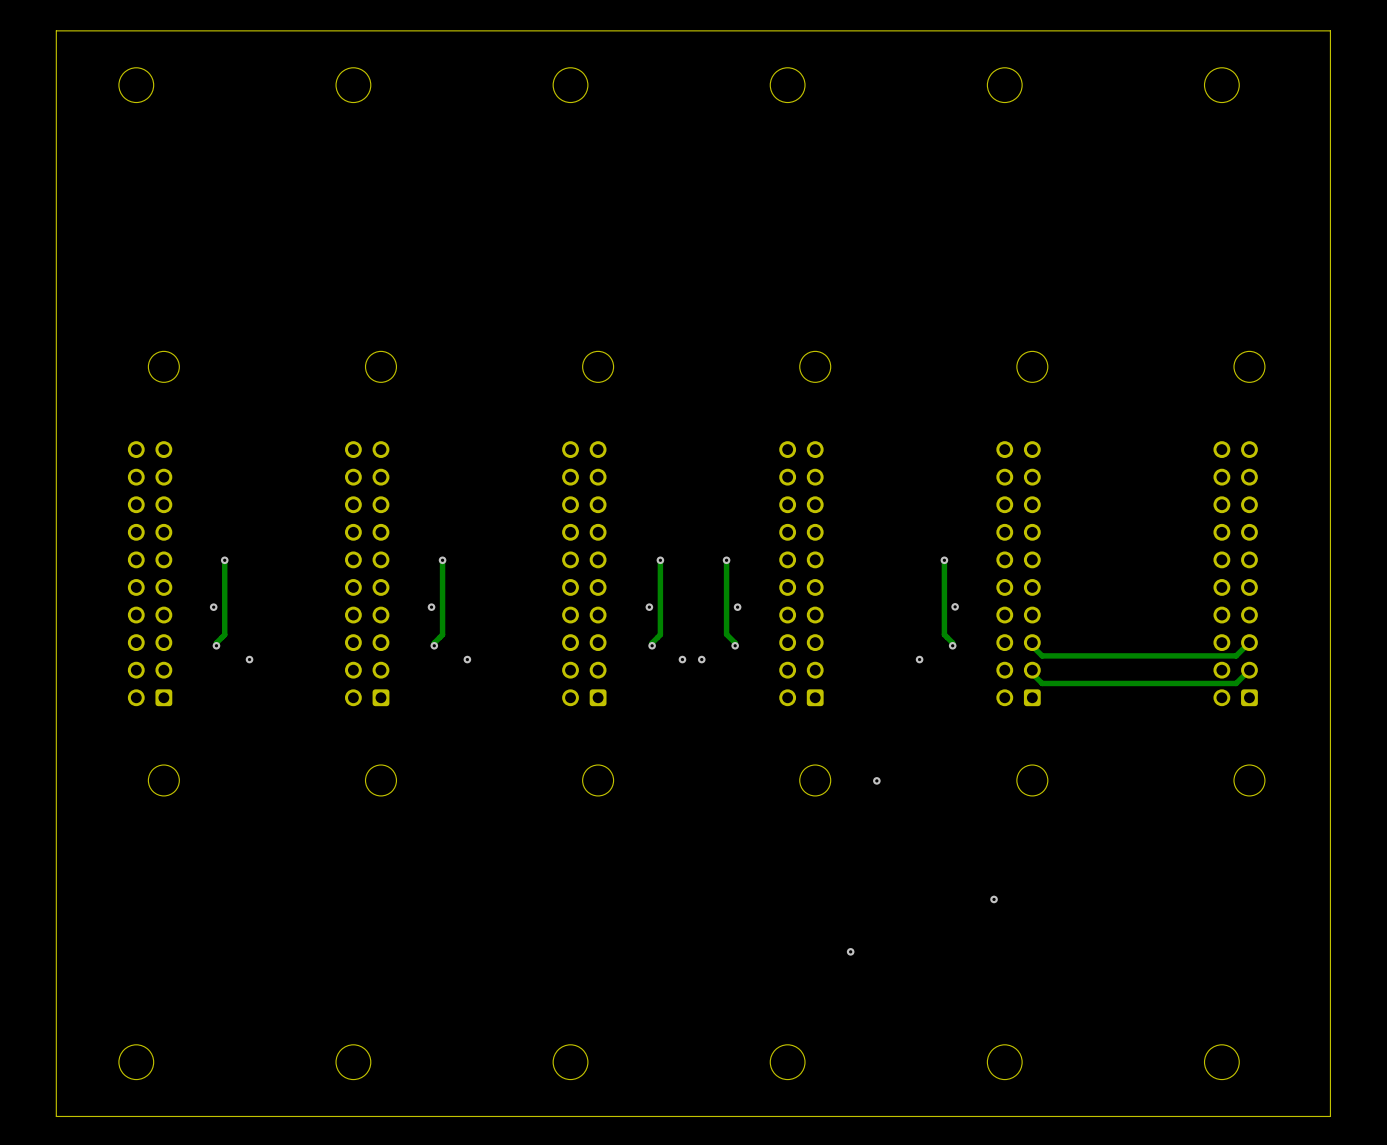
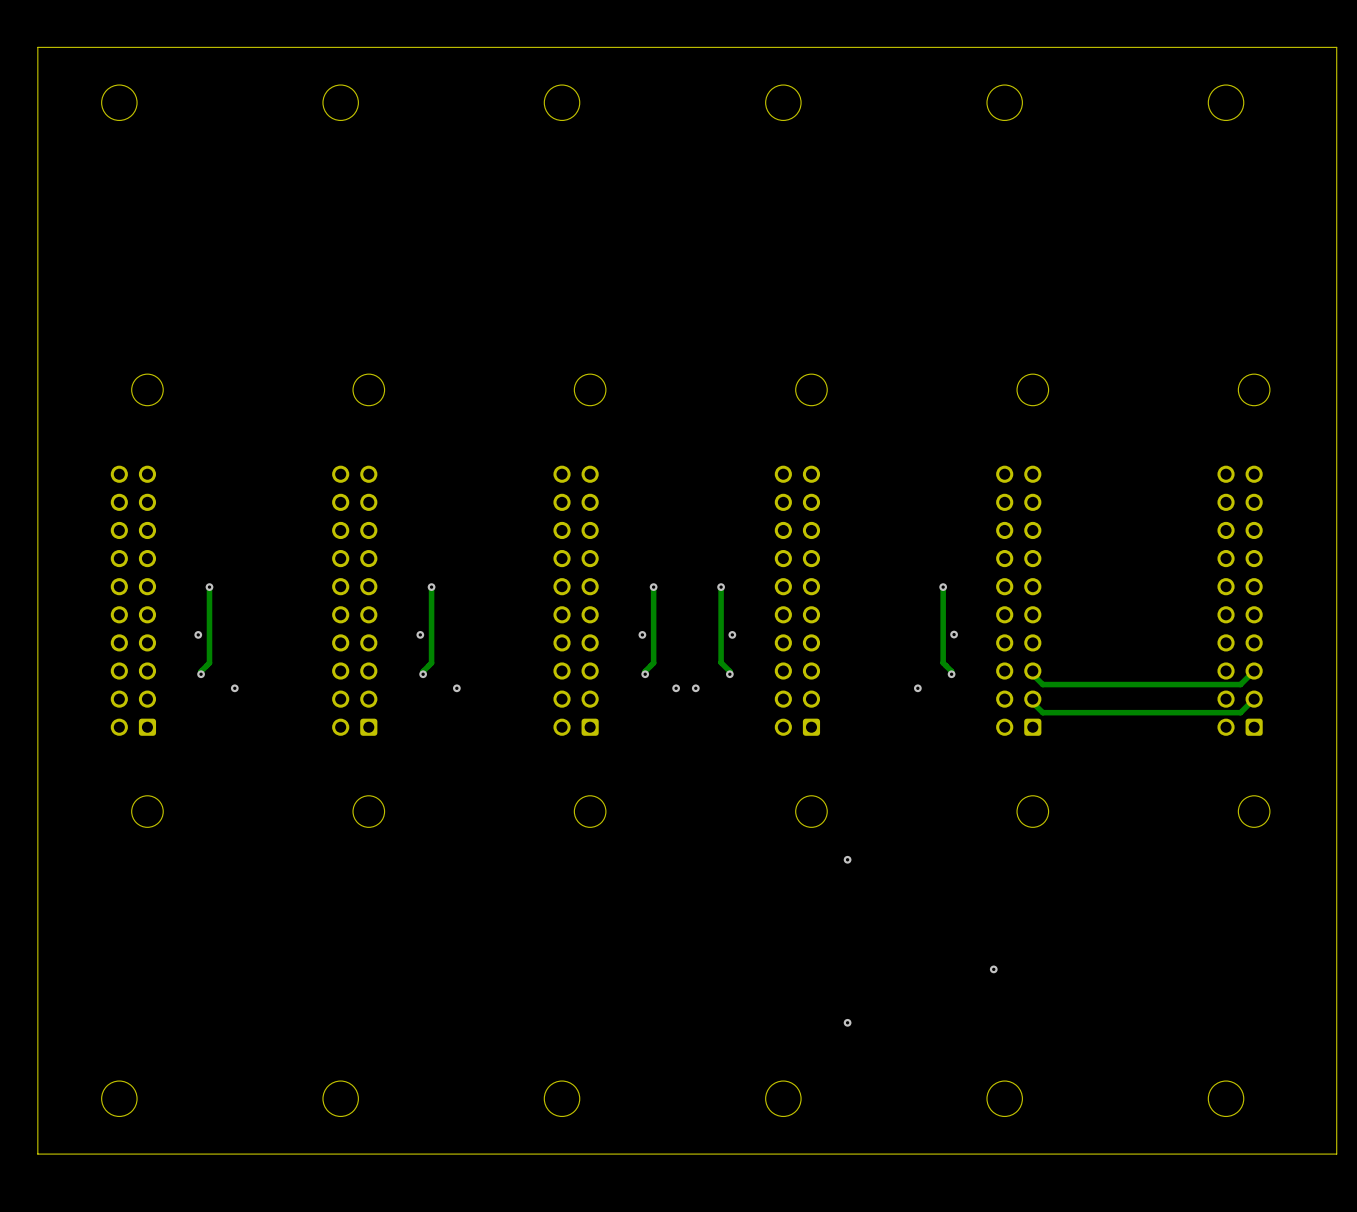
via position: (876, 780) -> (847, 859)
via position: (994, 899) -> (993, 969)
via position: (850, 951) -> (847, 1022)

